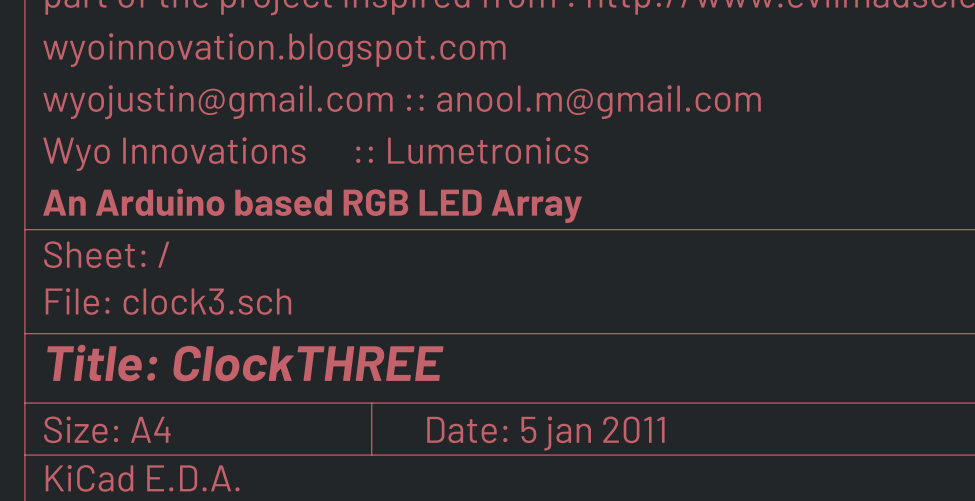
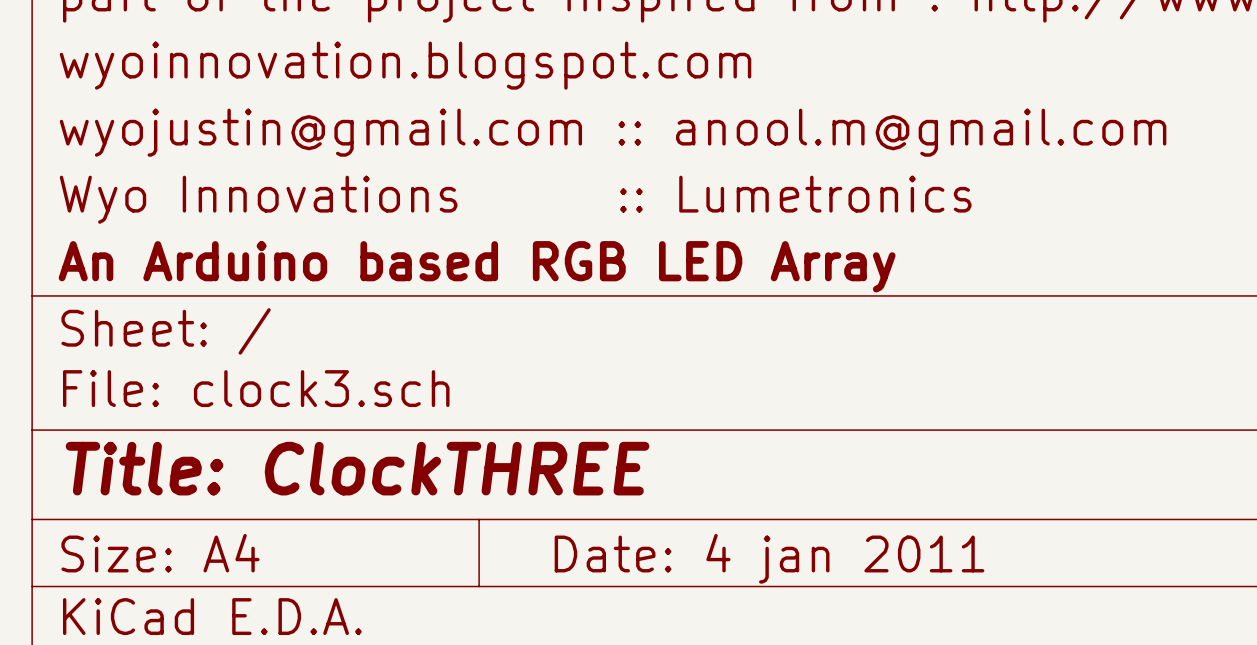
title block: Date: 5 jan 2011 (545, 433) -> Date: 4 jan 2011 (769, 558)

